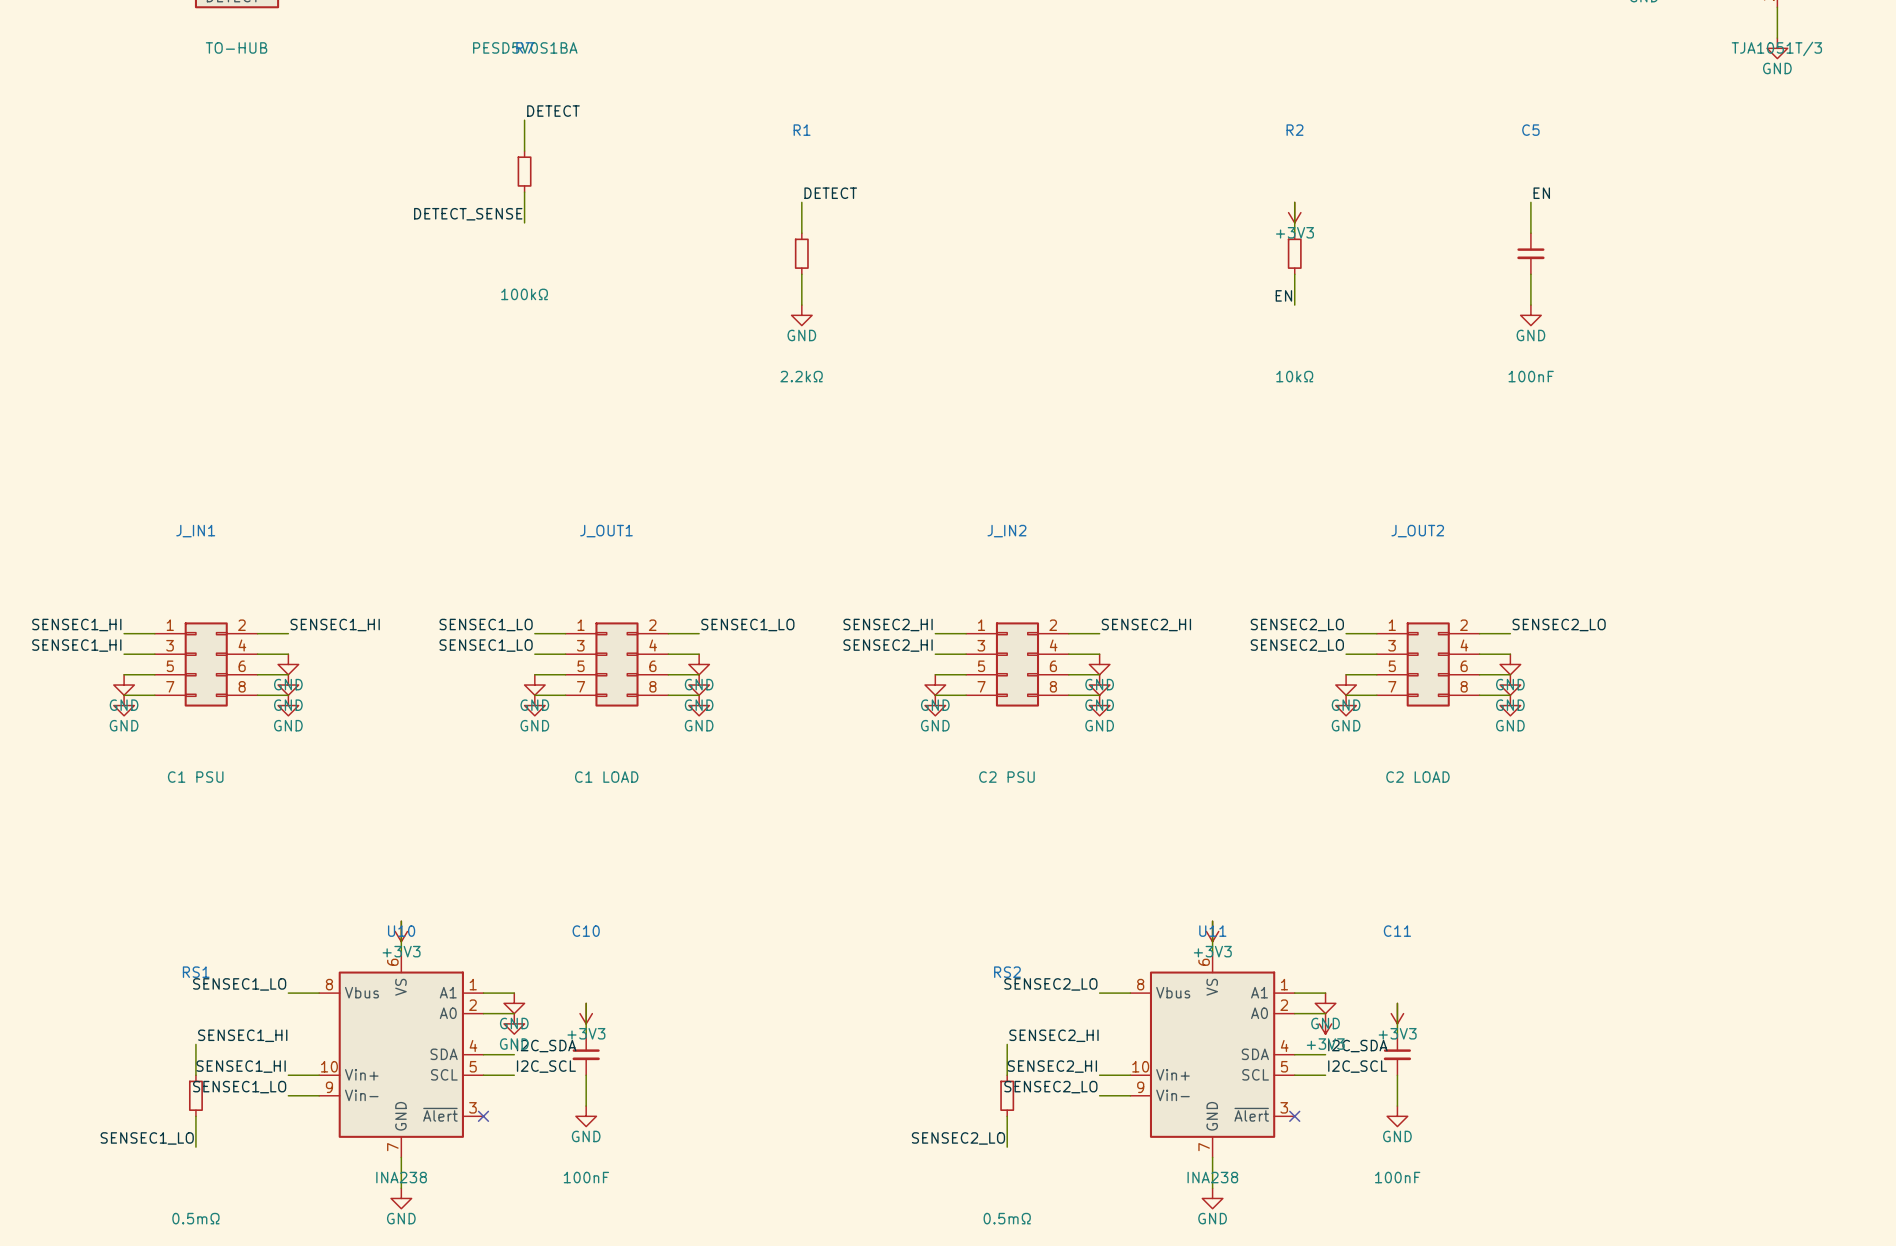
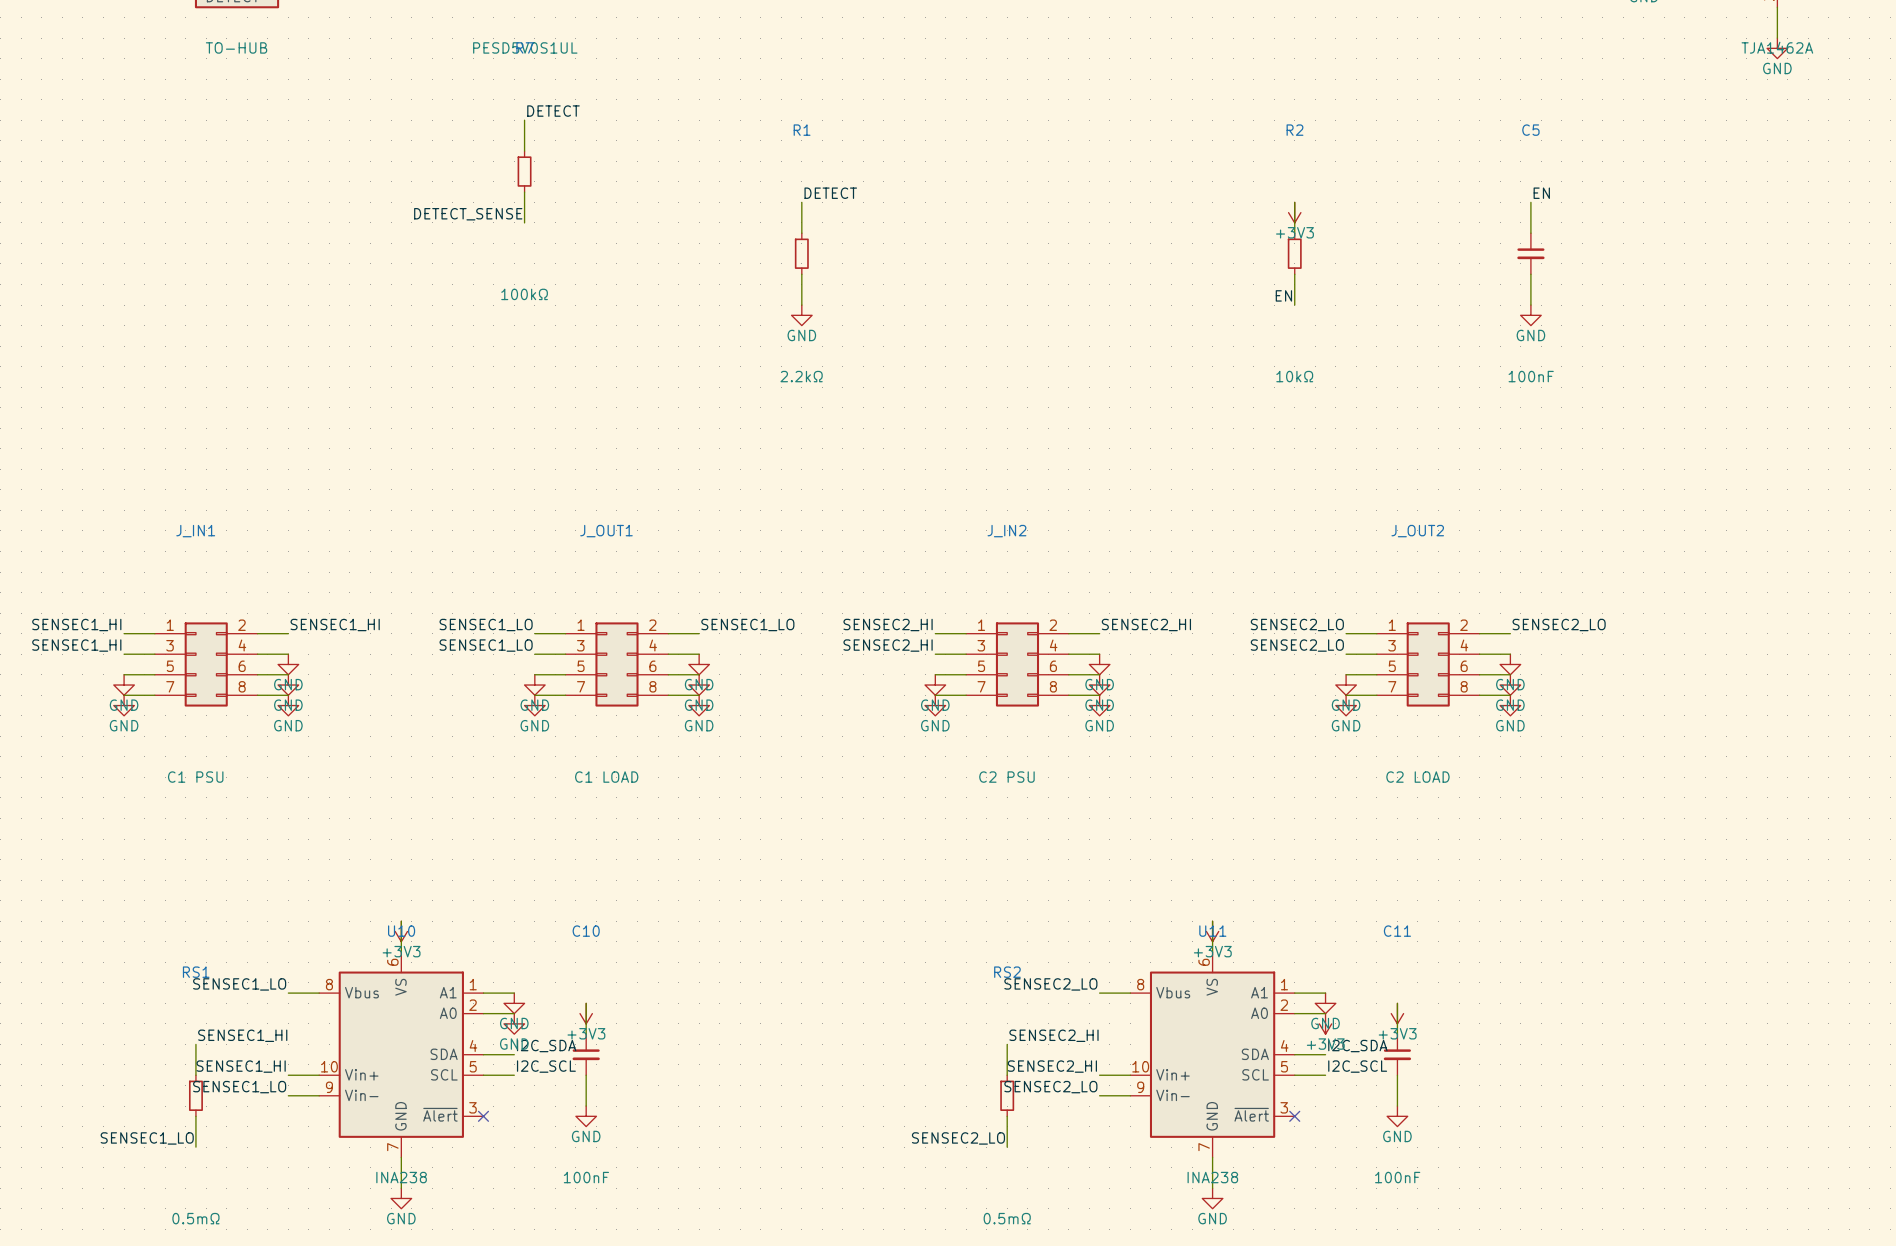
part value: PESD5V0S1BA (525, 47) -> PESD5V0S1UL (525, 47)
part value: TJA1051T/3 (1776, 48) -> TJA1462A (1777, 47)

